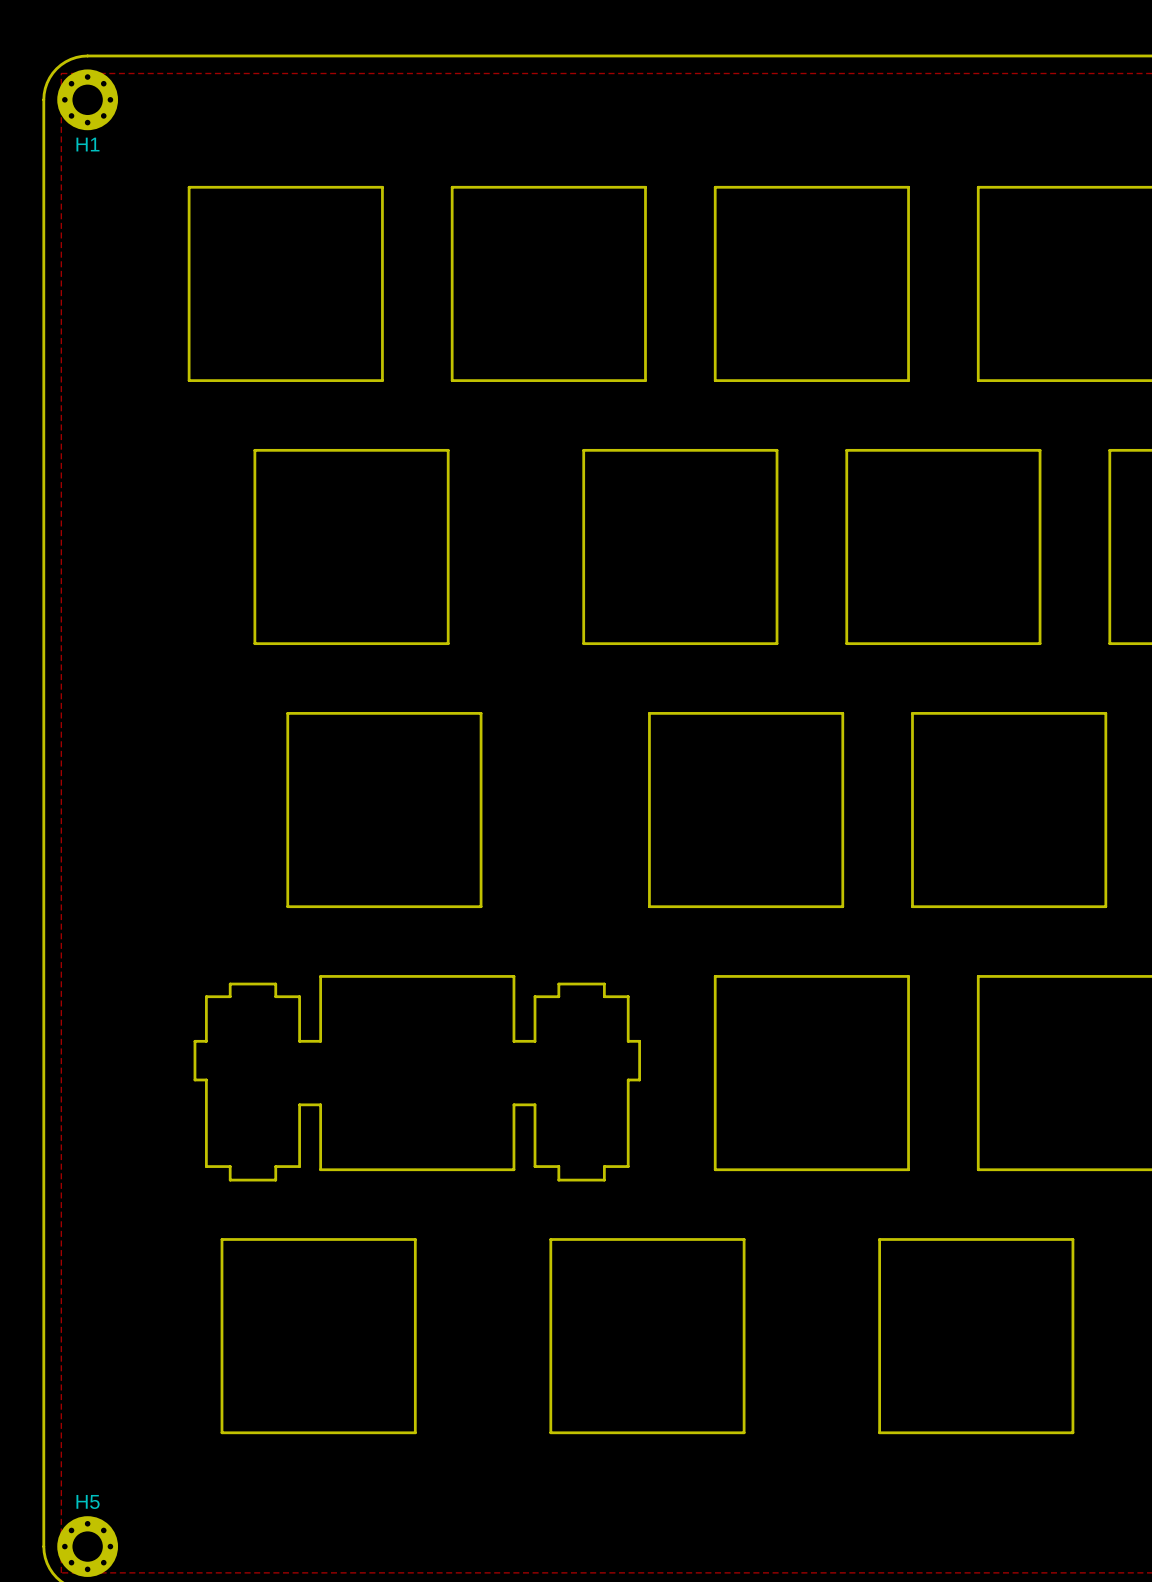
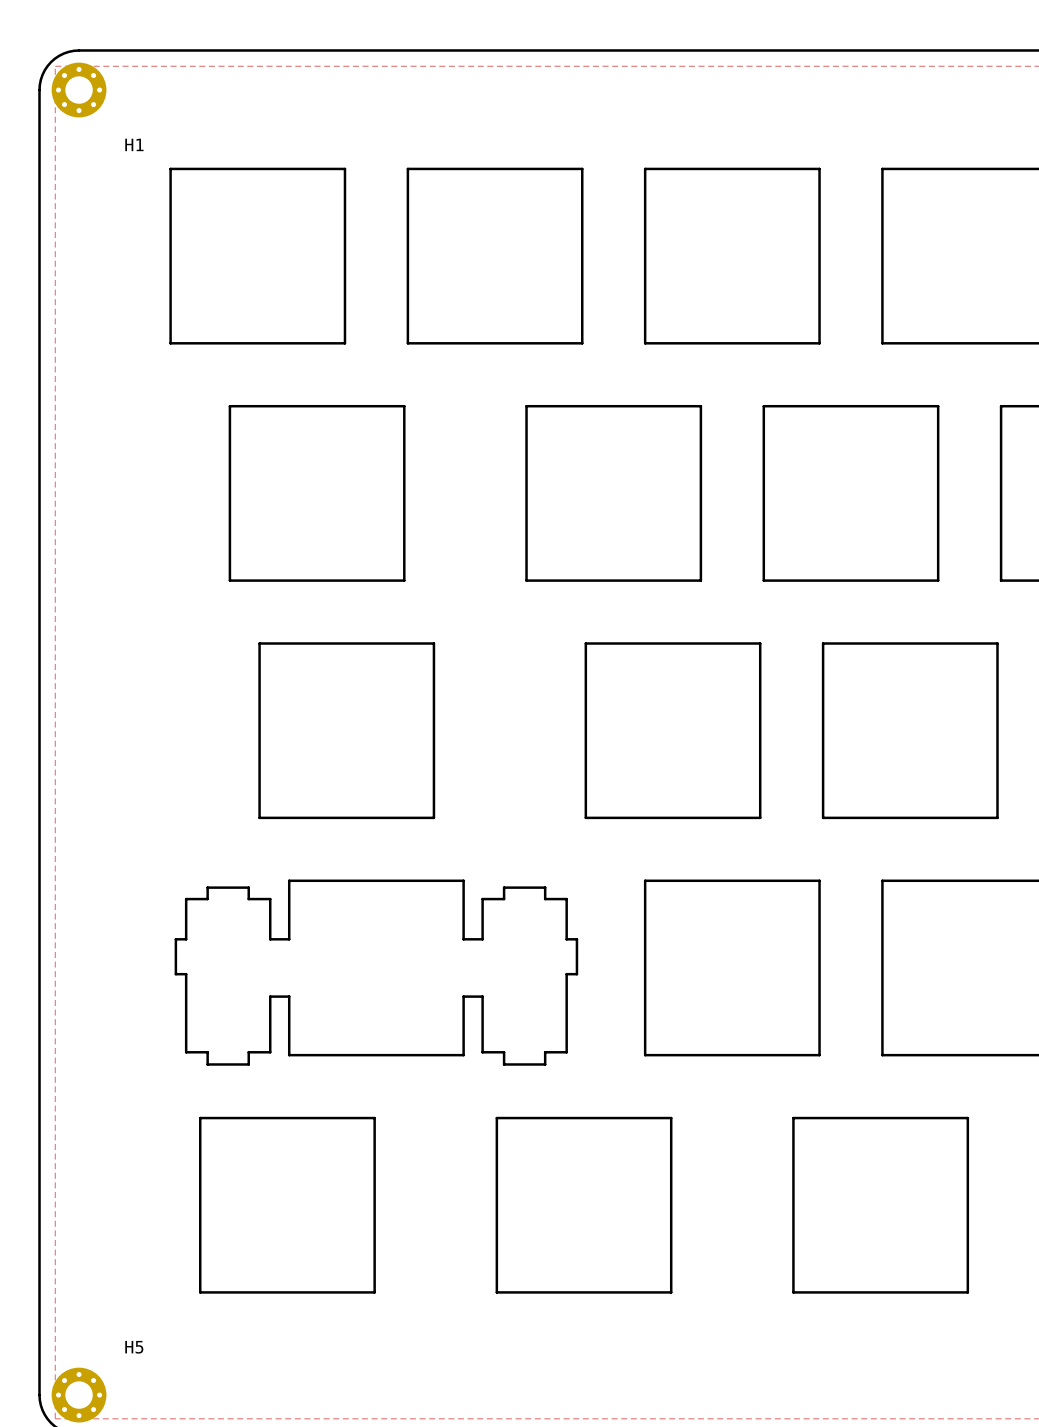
H1 name position: H1 (87, 144) -> H1 (134, 144)
H5 name position: H5 (88, 1501) -> H5 (134, 1347)

